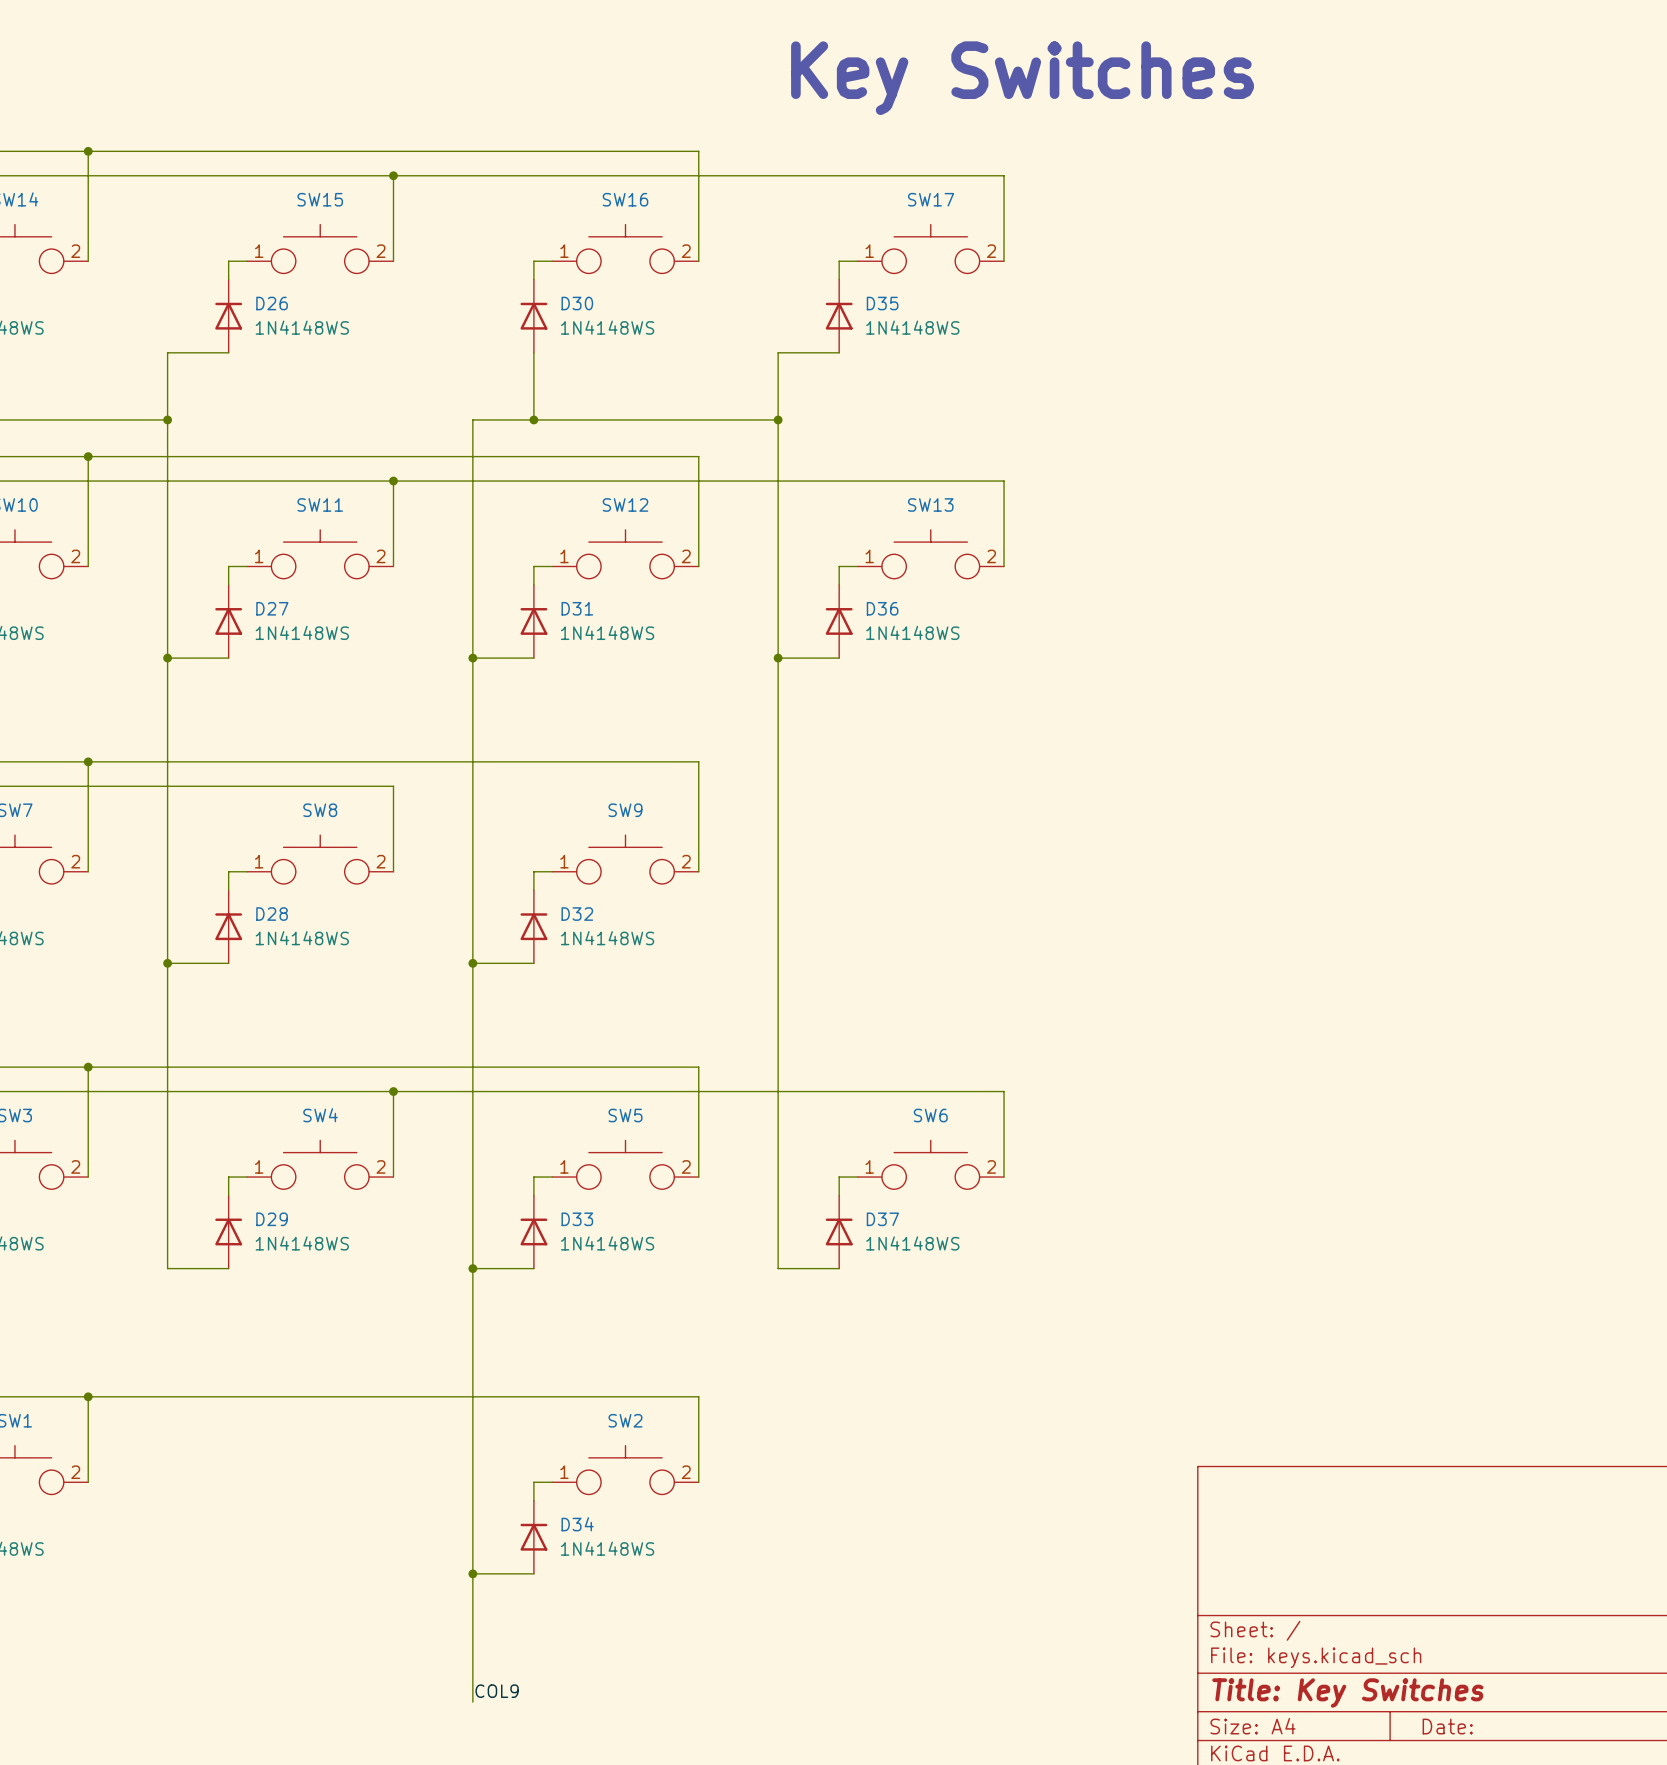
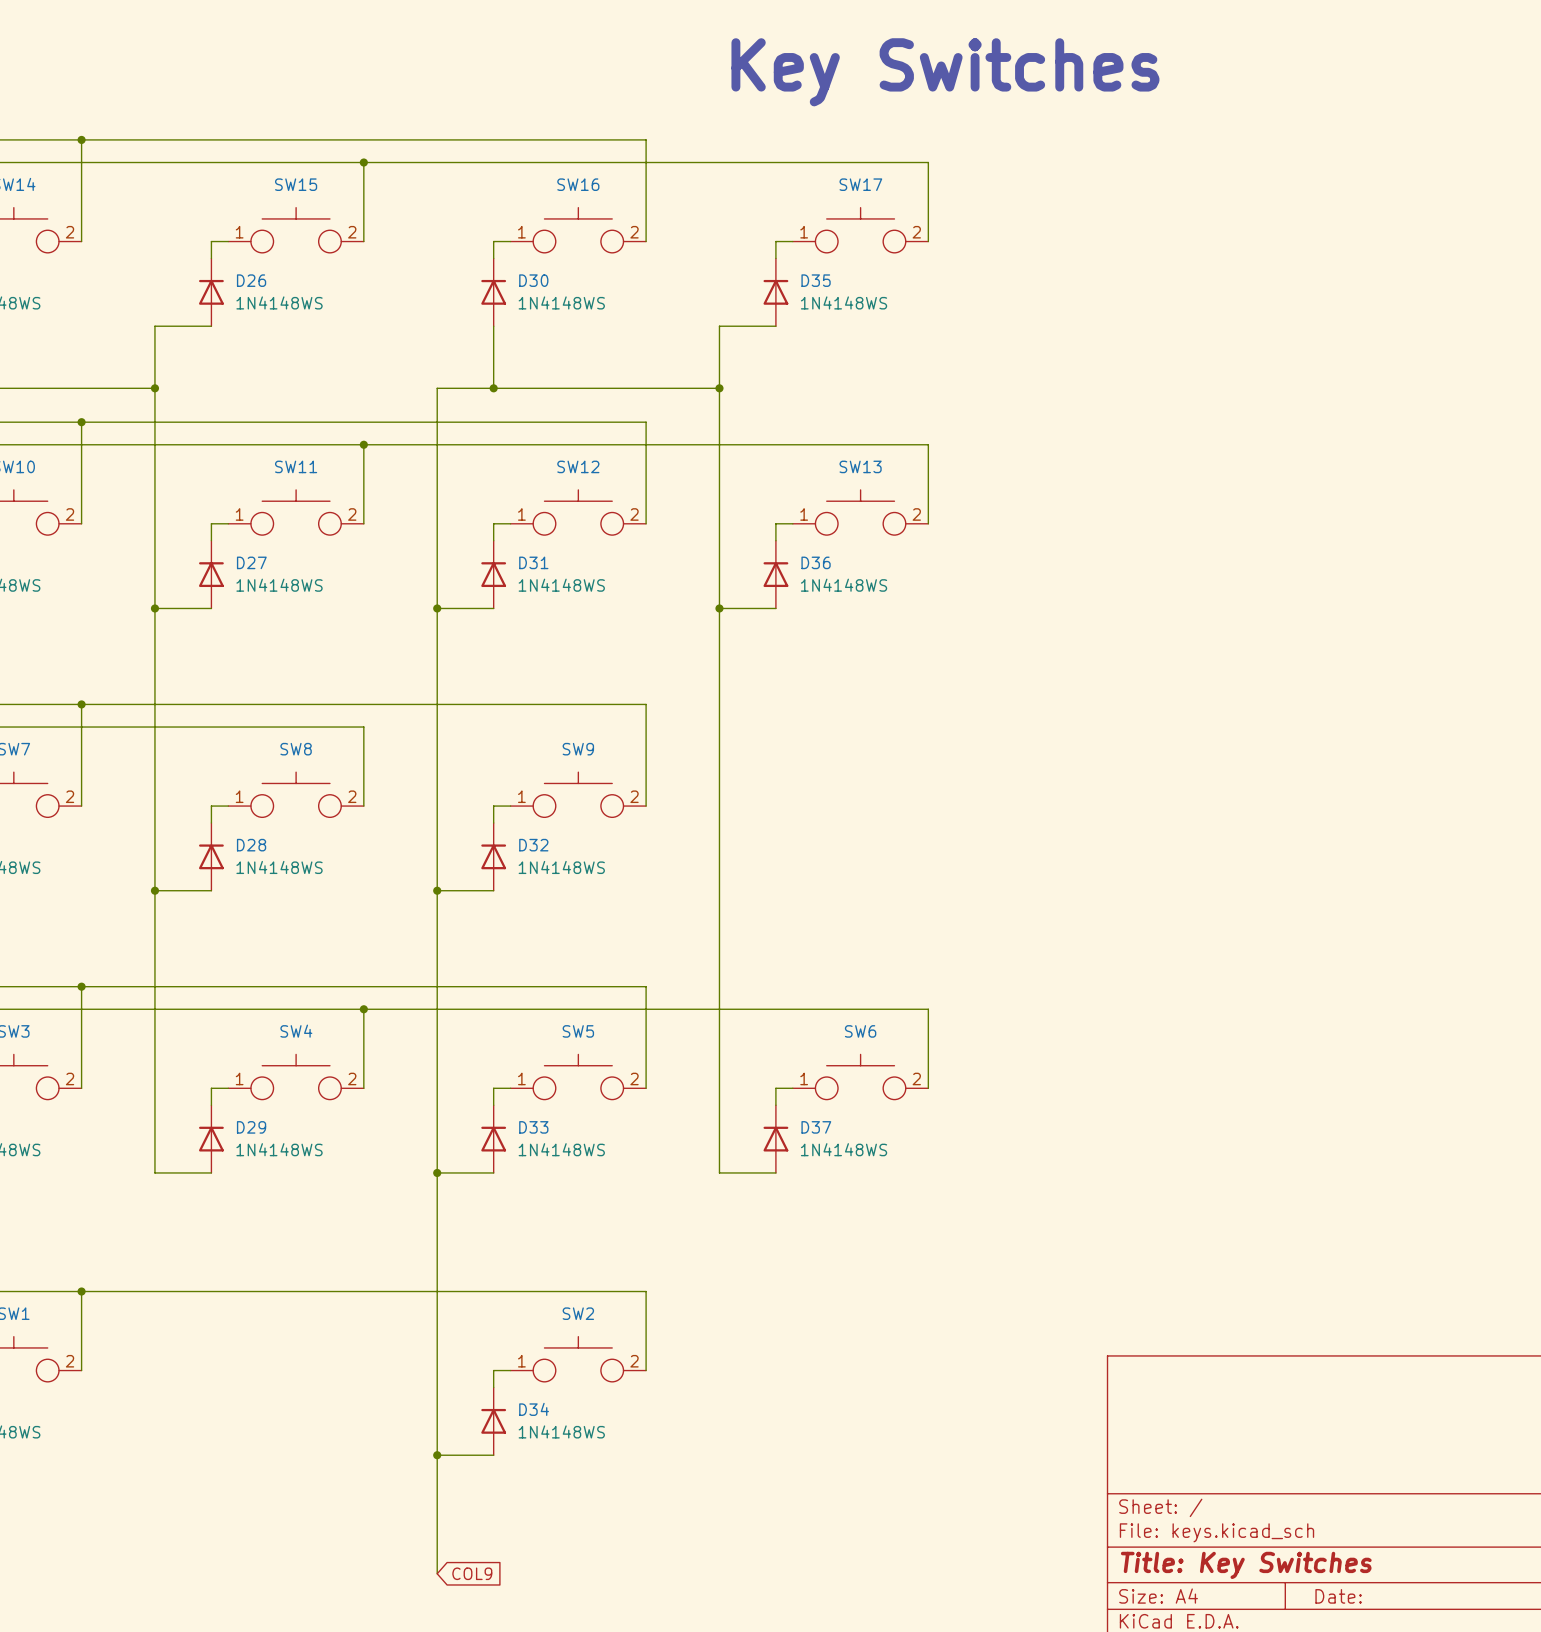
label: COL9 (497, 1691) -> none
global label: none -> COL9 (472, 1573)

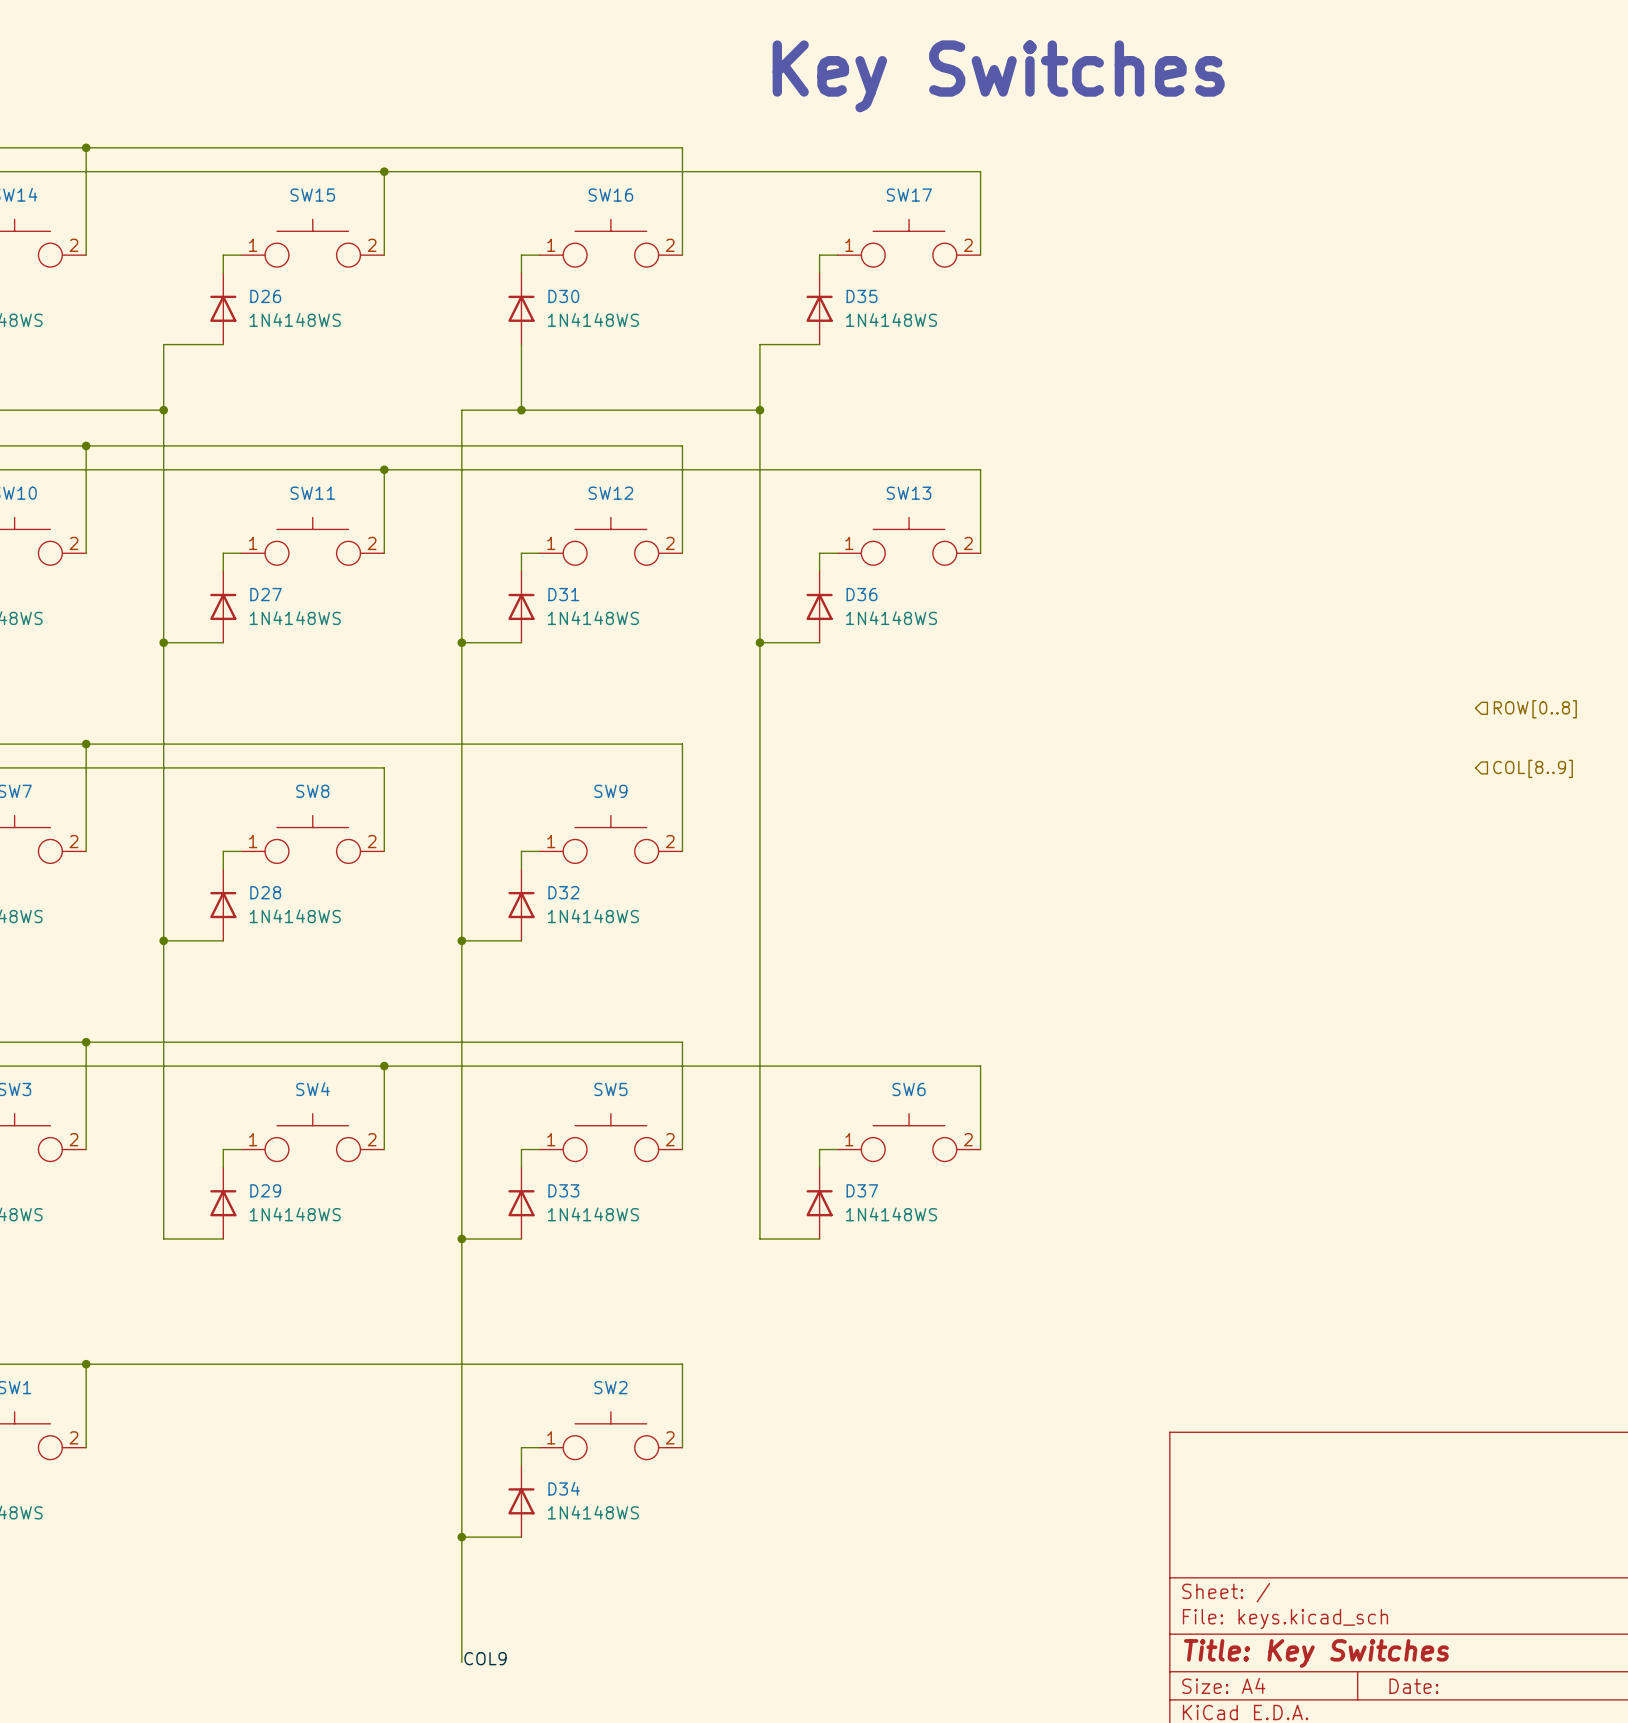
hierarchical label: none -> ROW[0..8] (1535, 709)
hierarchical label: none -> COL[8..9] (1533, 768)
label: none -> COL9 (485, 1658)
global label: COL9 (472, 1573) -> none

